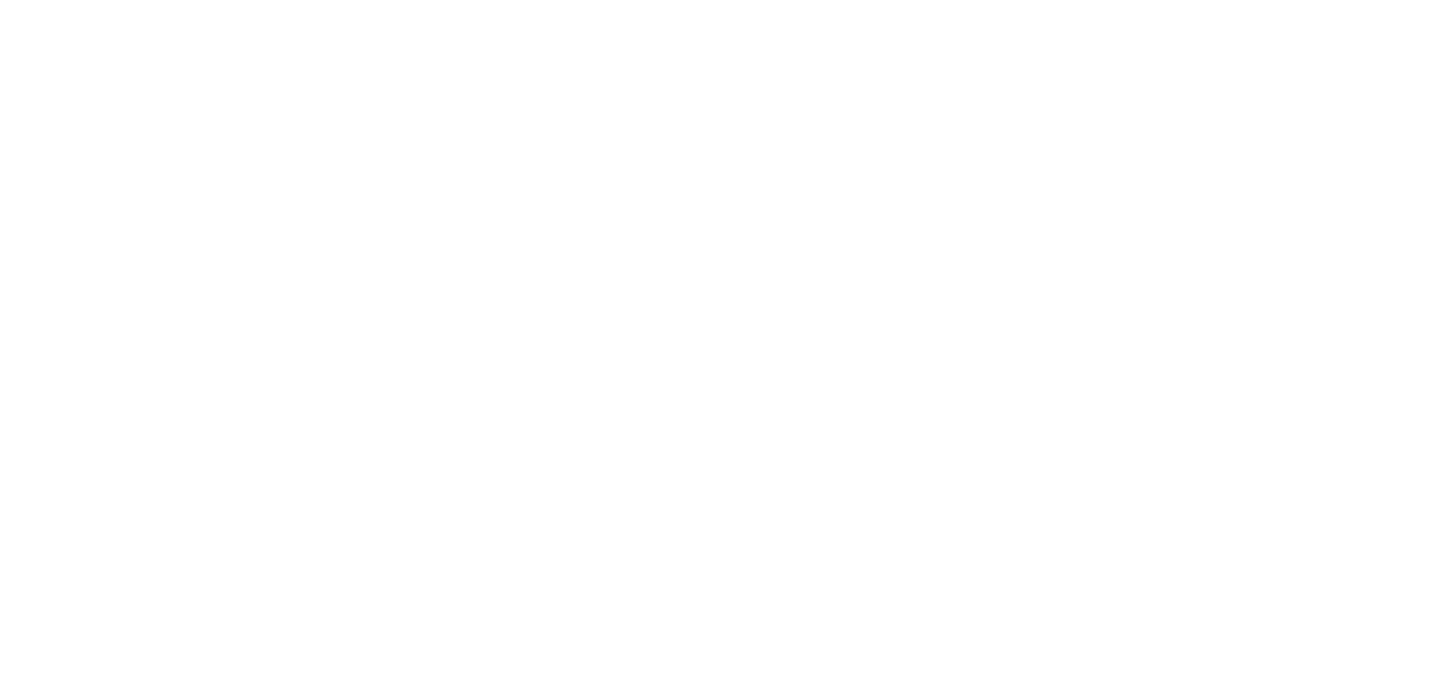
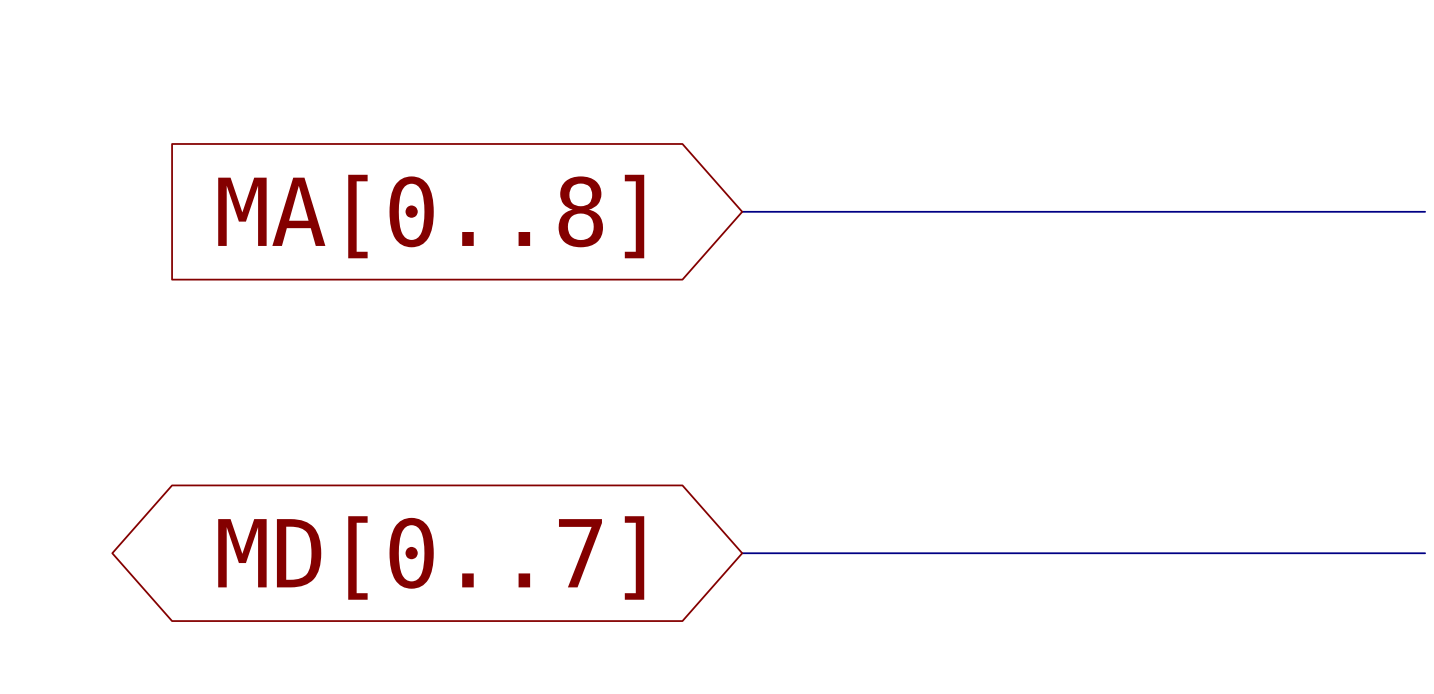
bus: none -> (742, 211) (1425, 211)
global label: none -> MA[0..8] (431, 216)
bus: none -> (742, 553) (1425, 553)
global label: none -> MD[0..7] (431, 557)

